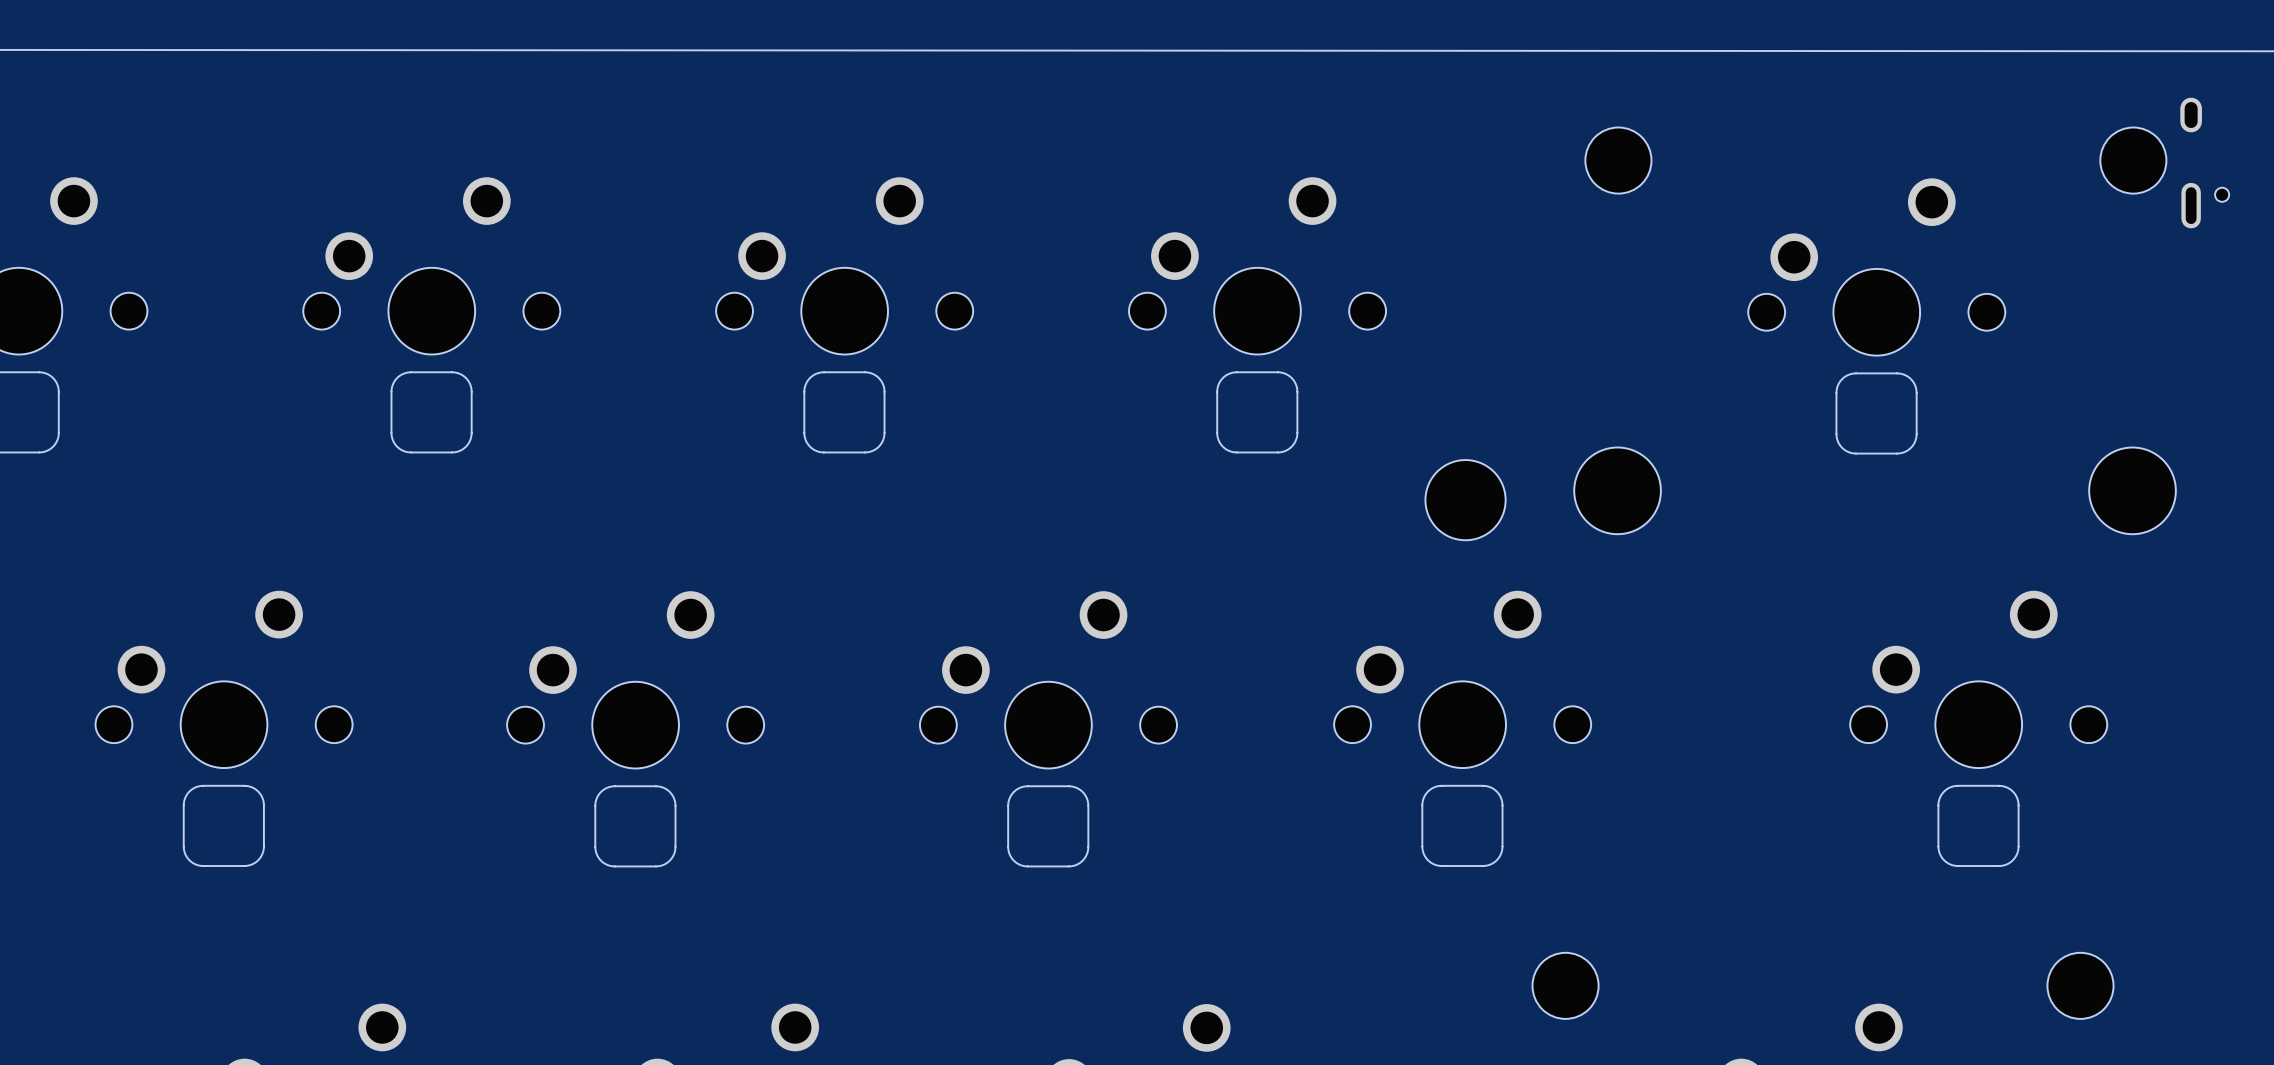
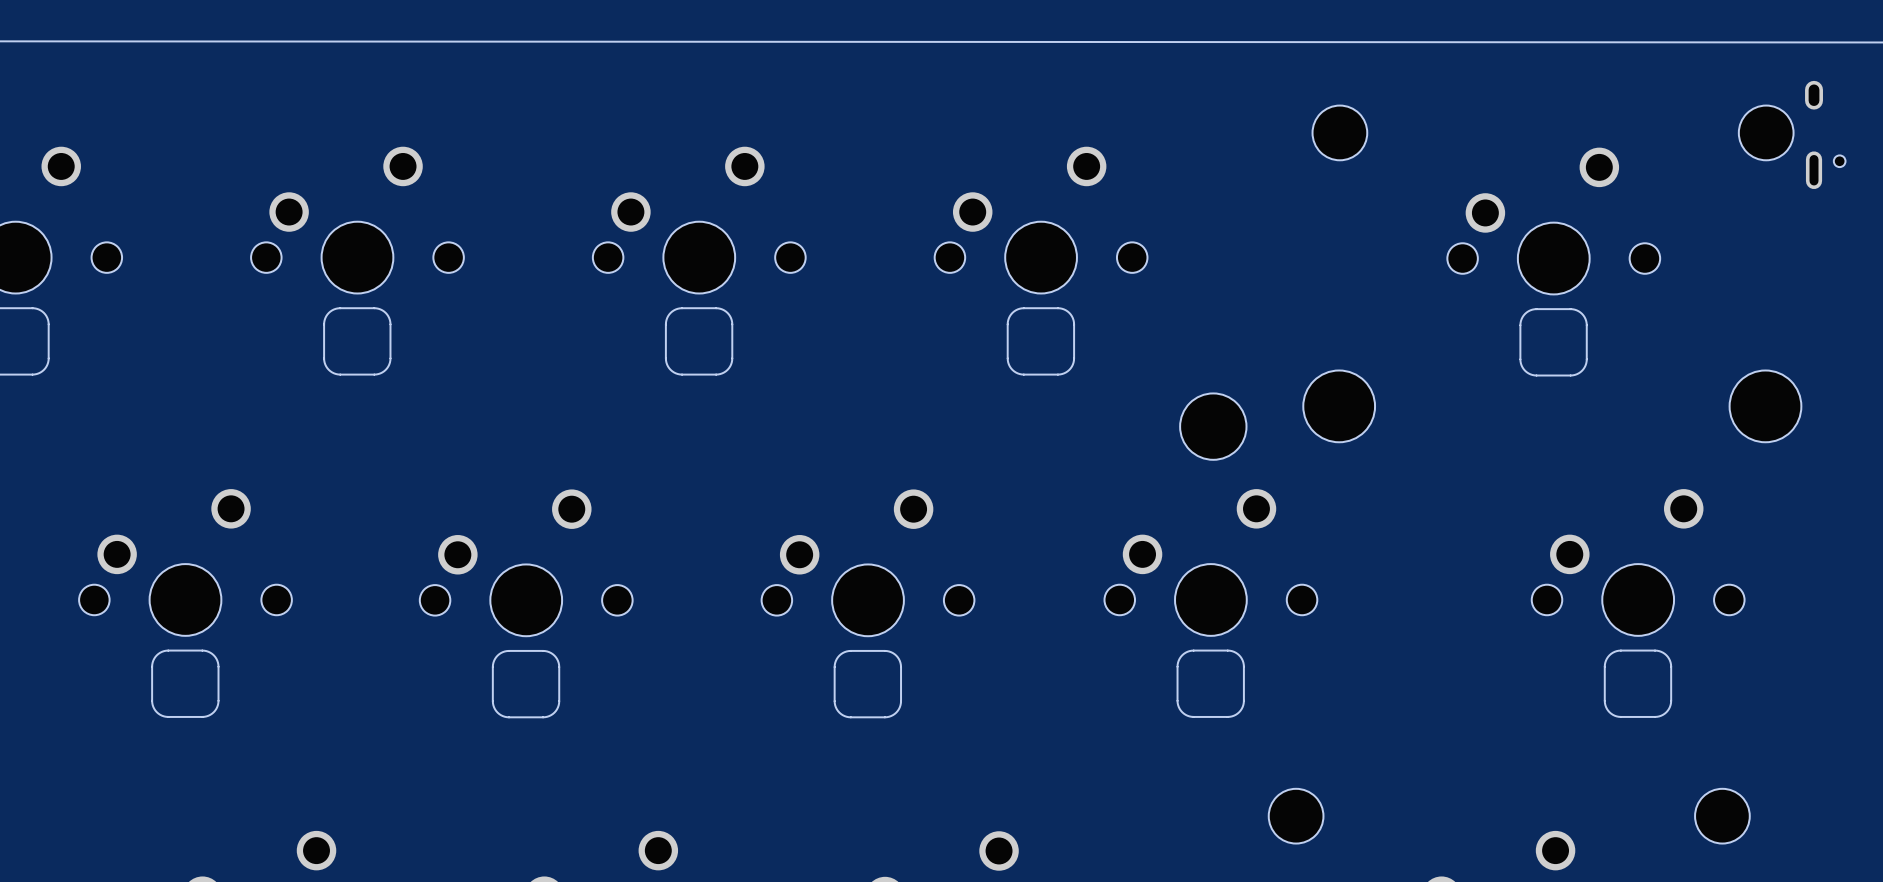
part position: (1465, 500) -> (1213, 426)

